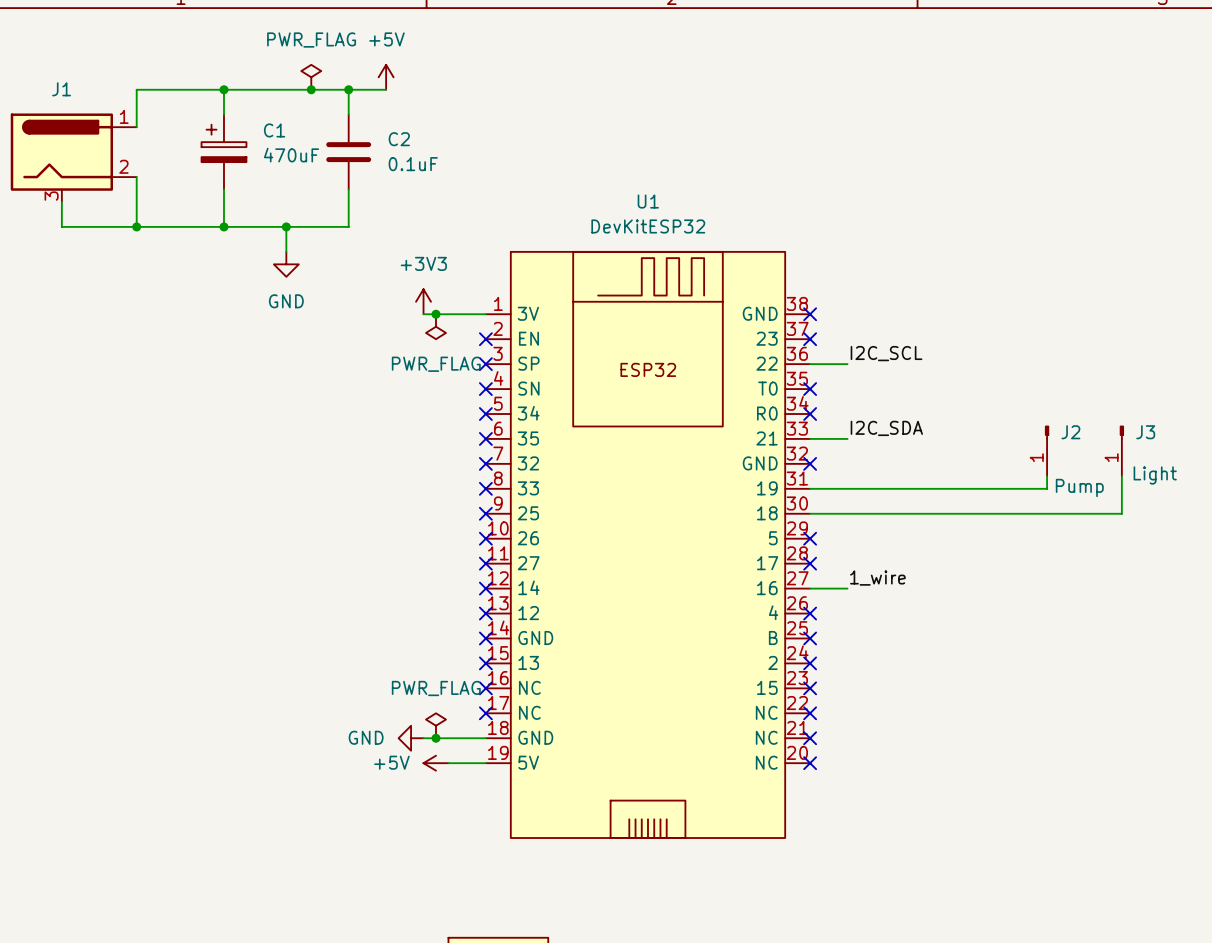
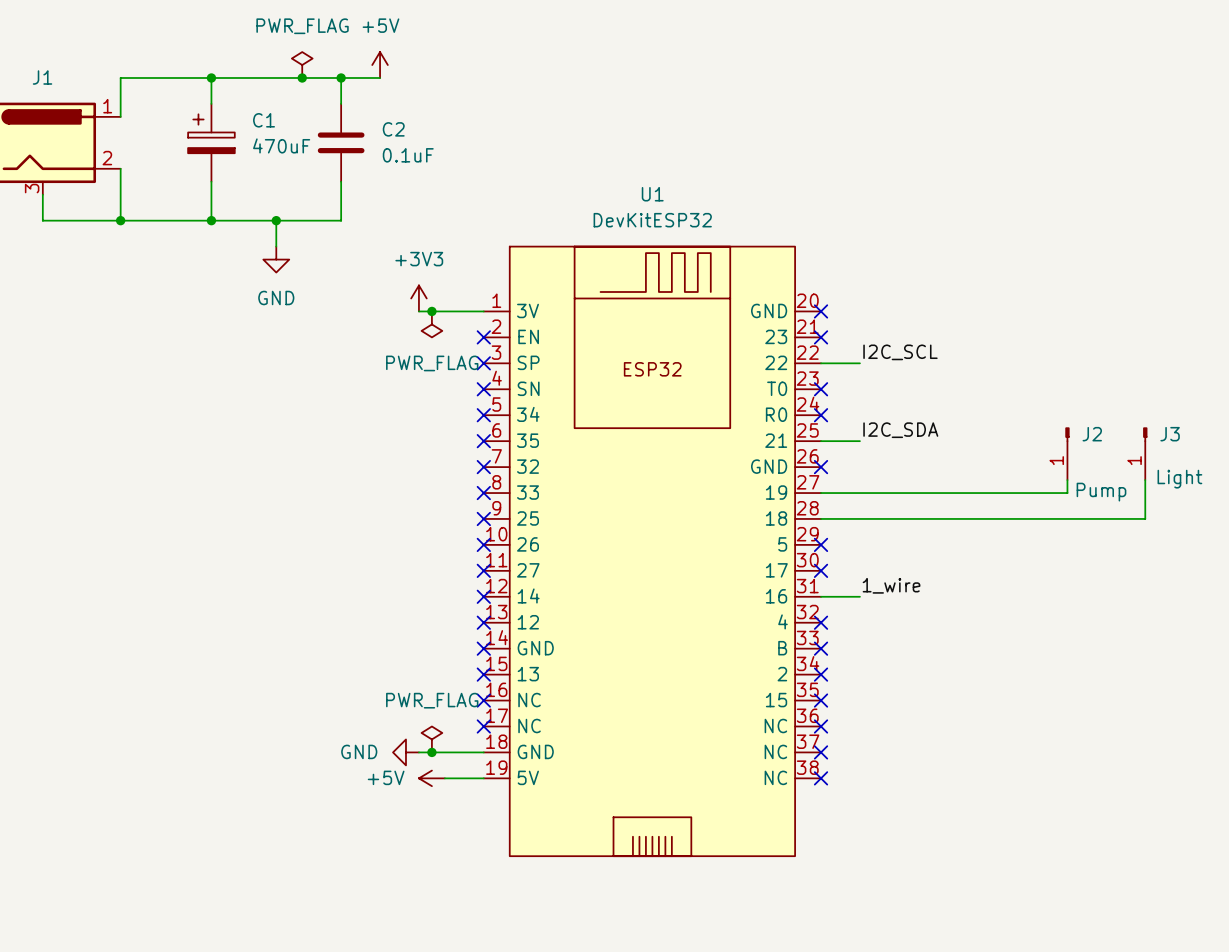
U1 symbol: [485, 251, 811, 839] -> [483, 246, 822, 857]

